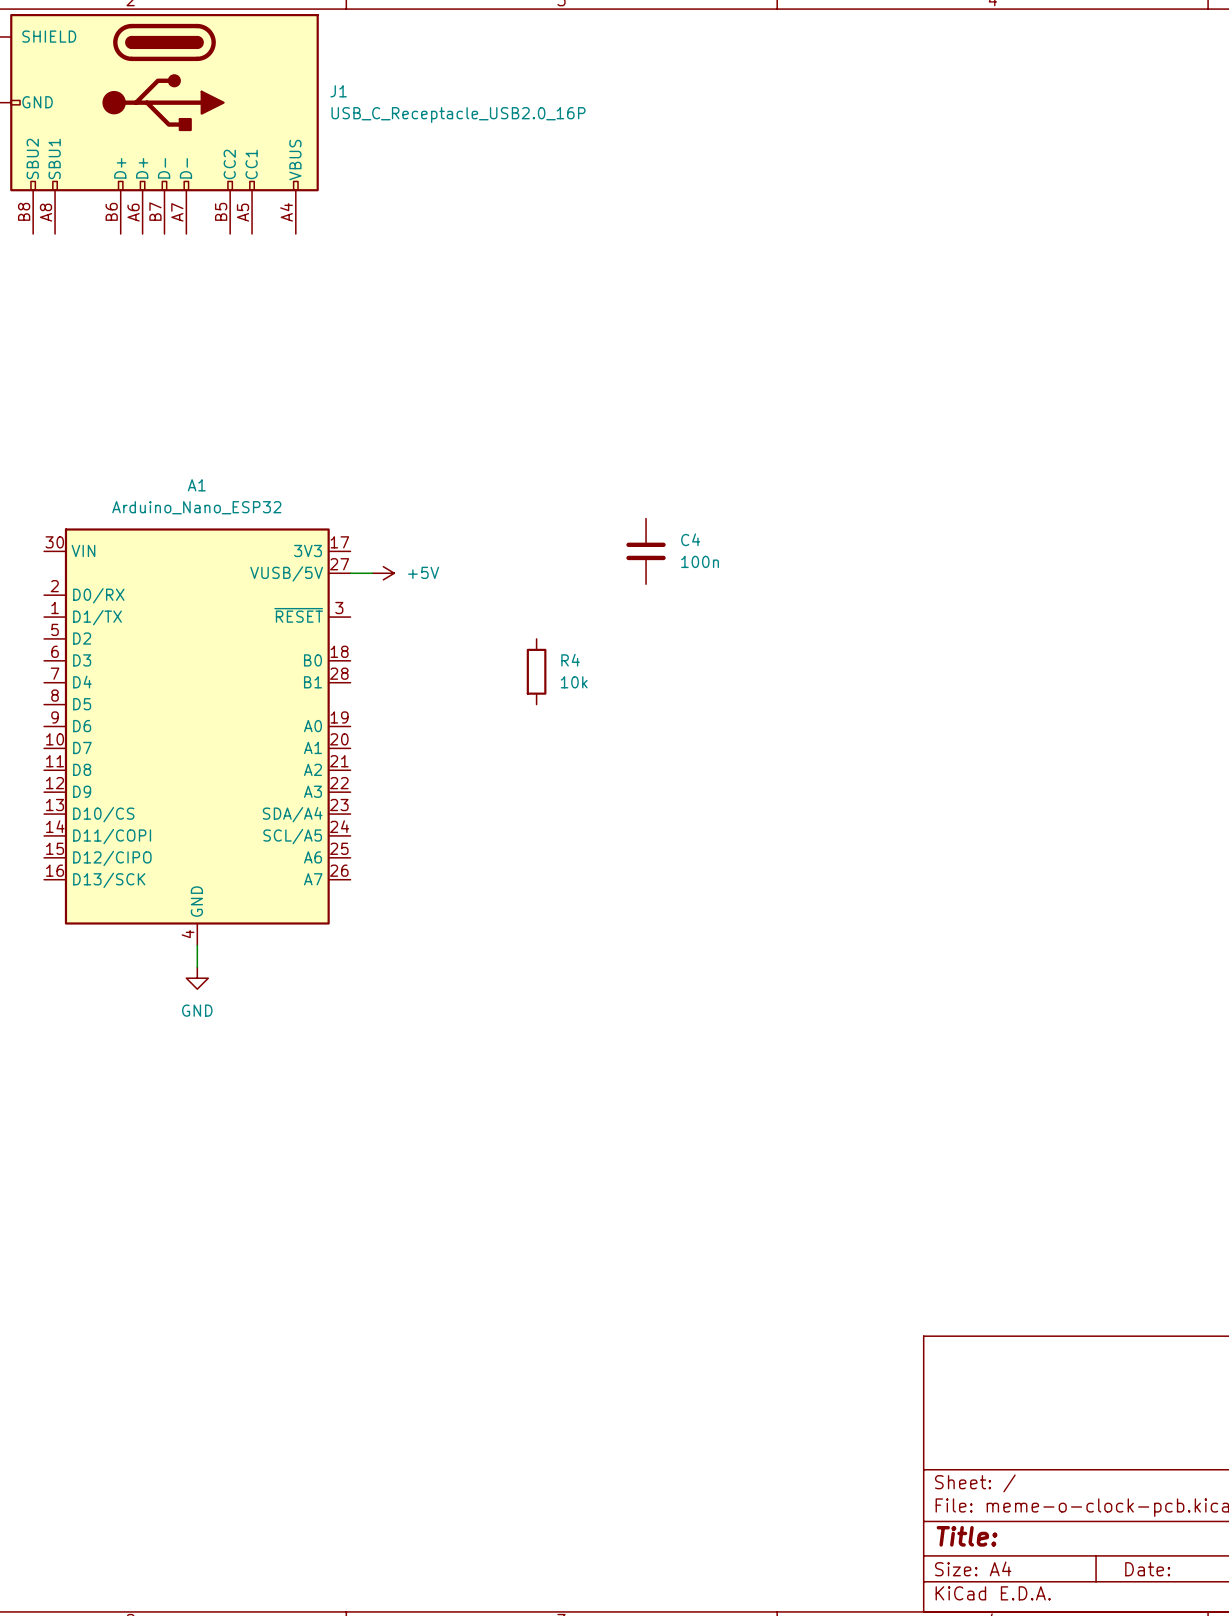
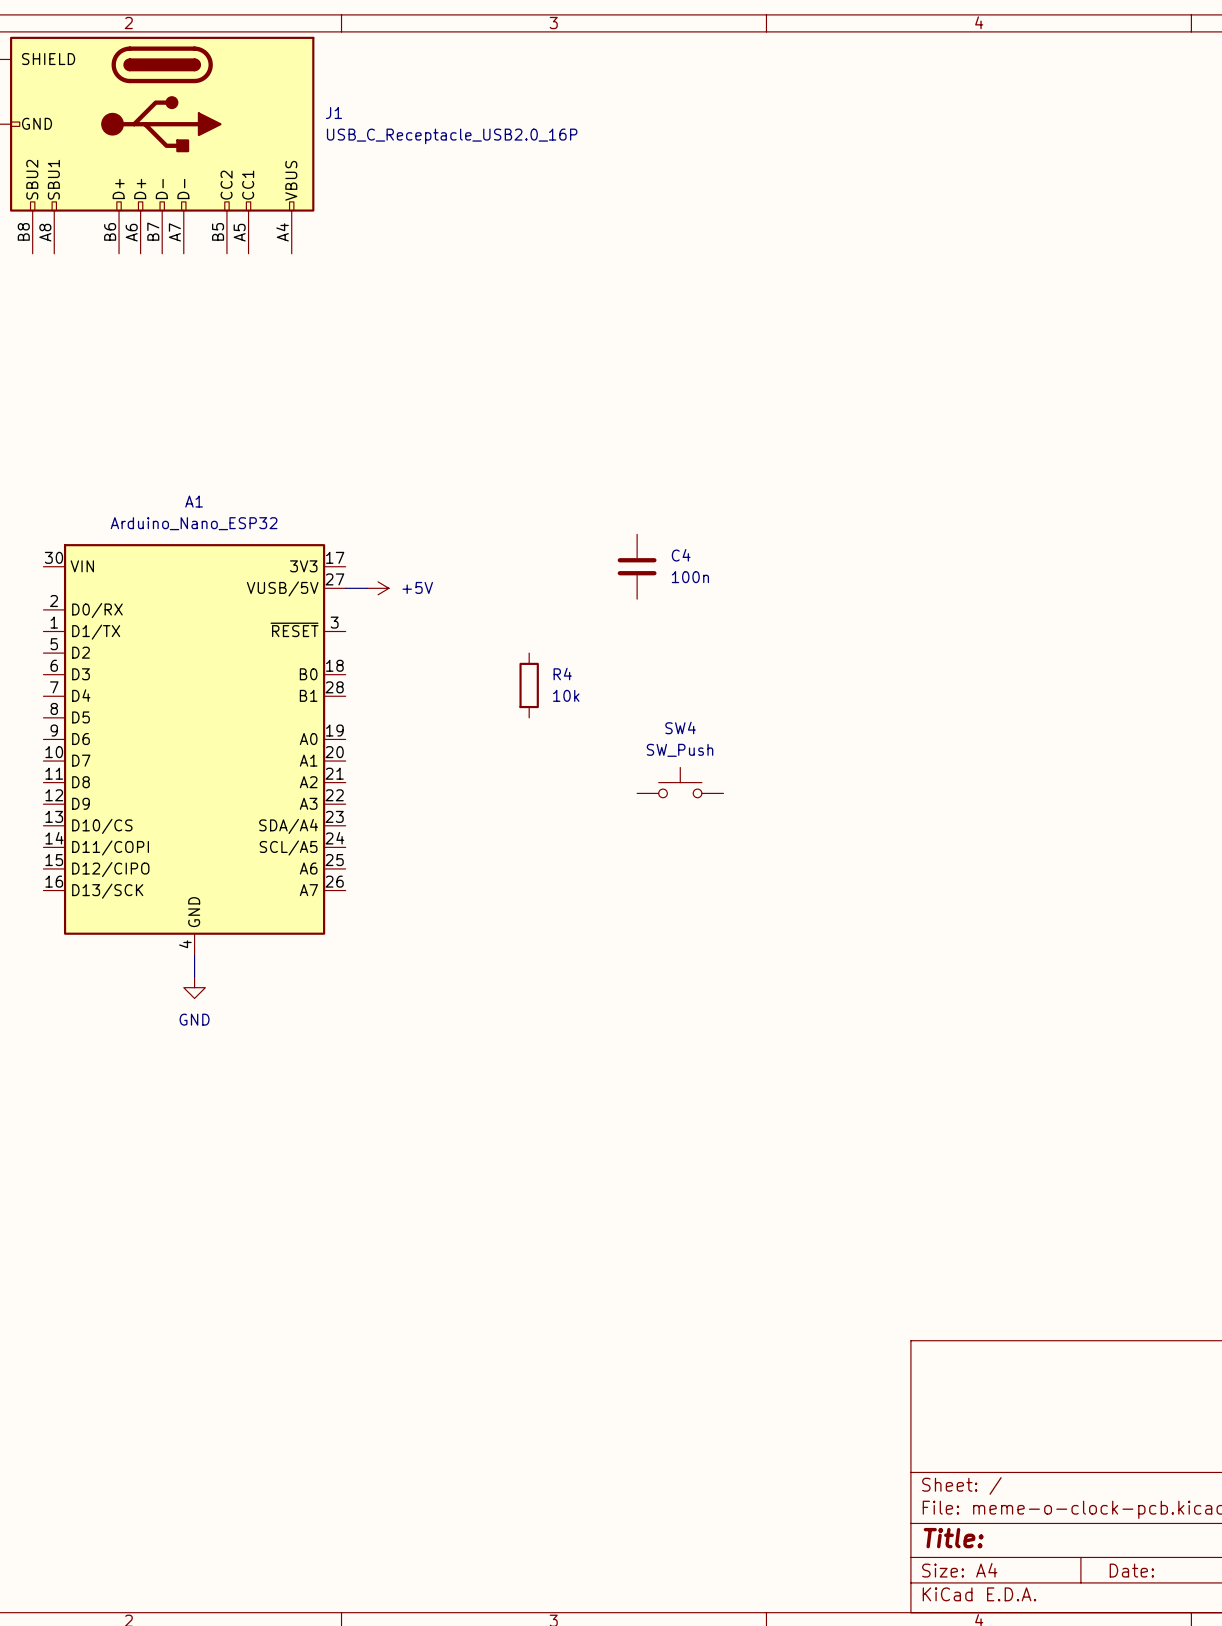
SW4: none -> SW_Push (680, 782)

